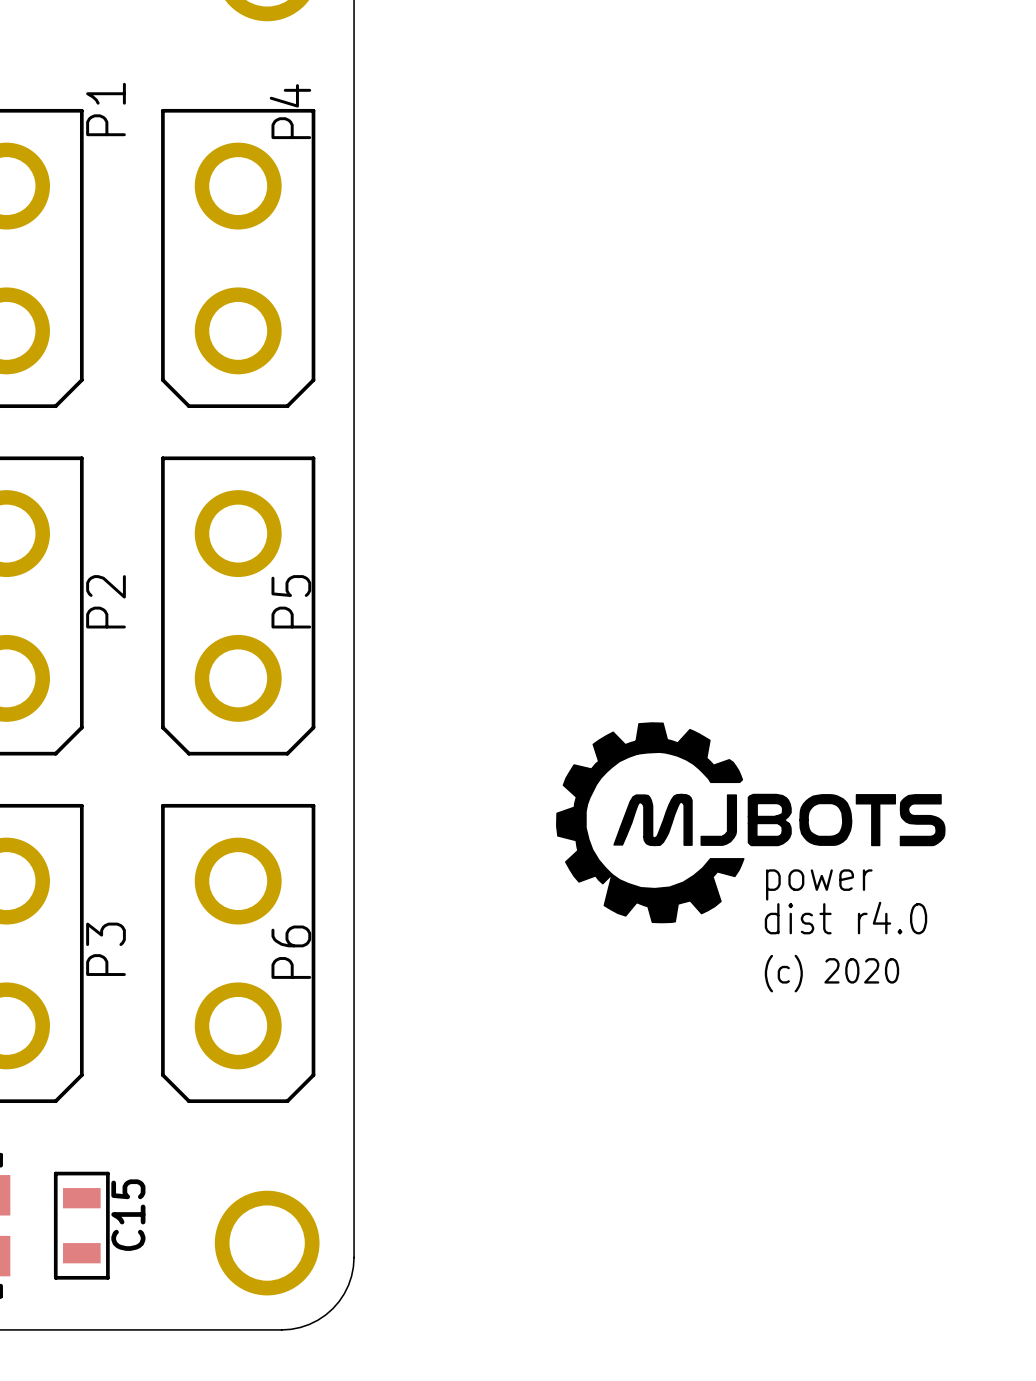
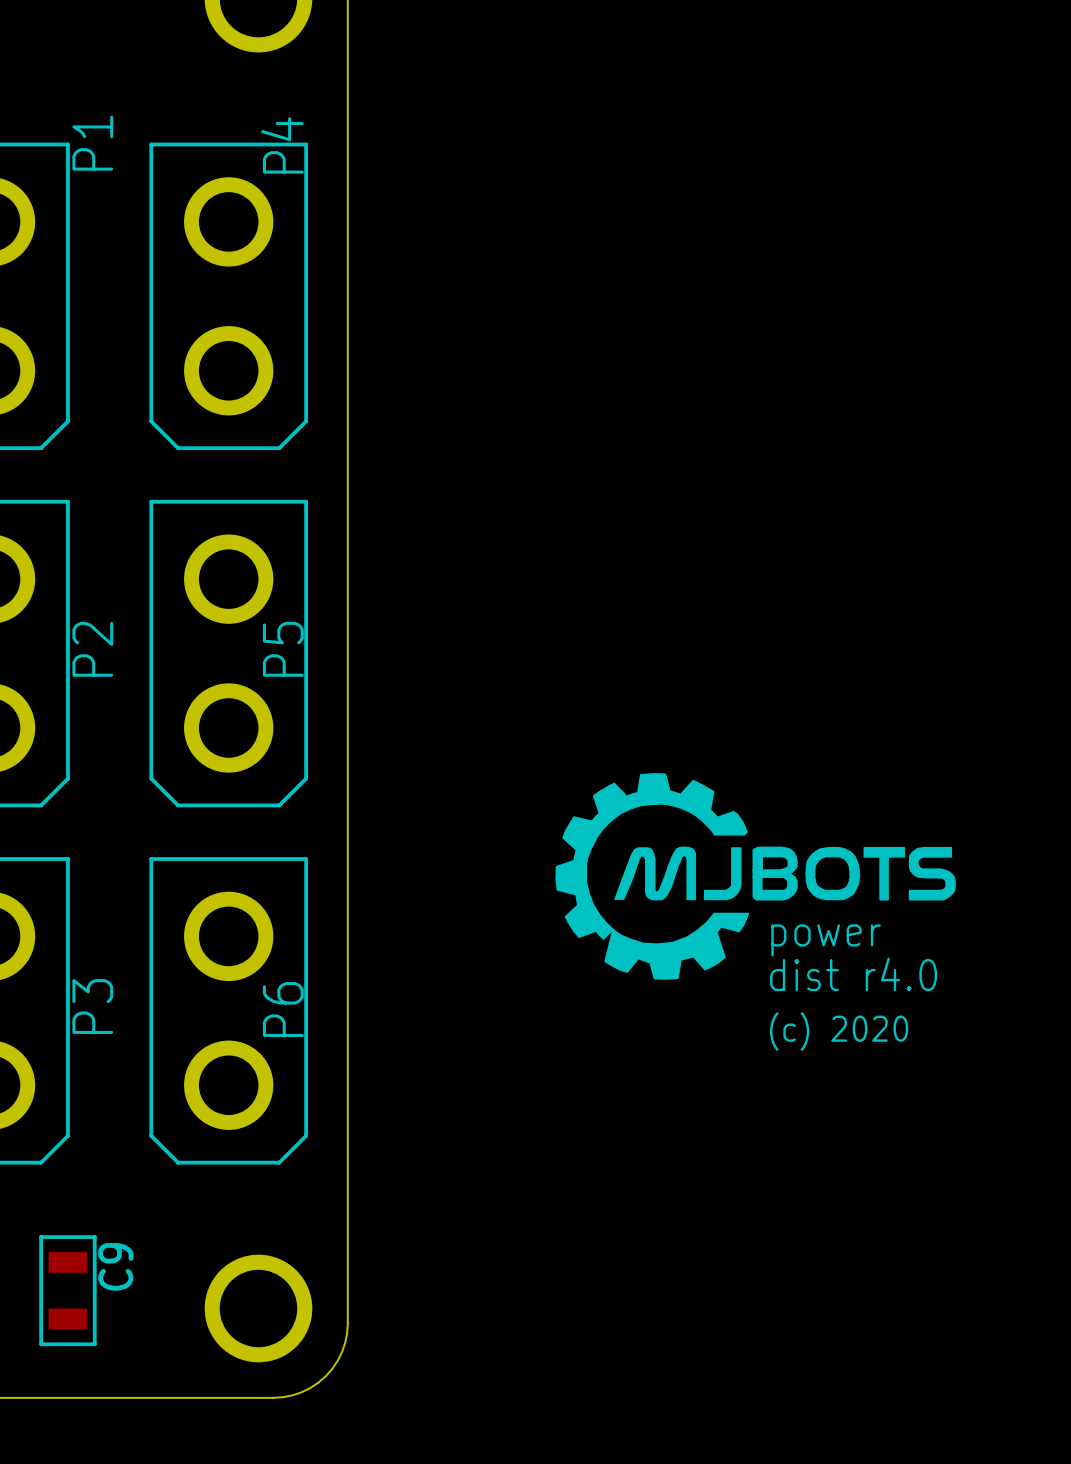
C15 name: C15 (128, 1215) -> C9 (115, 1266)

